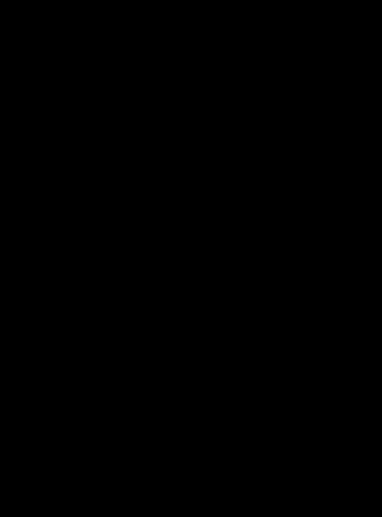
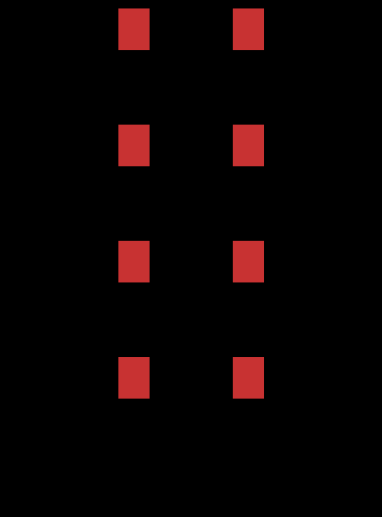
part: none -> (191, 29)
part: none -> (191, 145)
part: none -> (191, 261)
part: none -> (191, 377)

